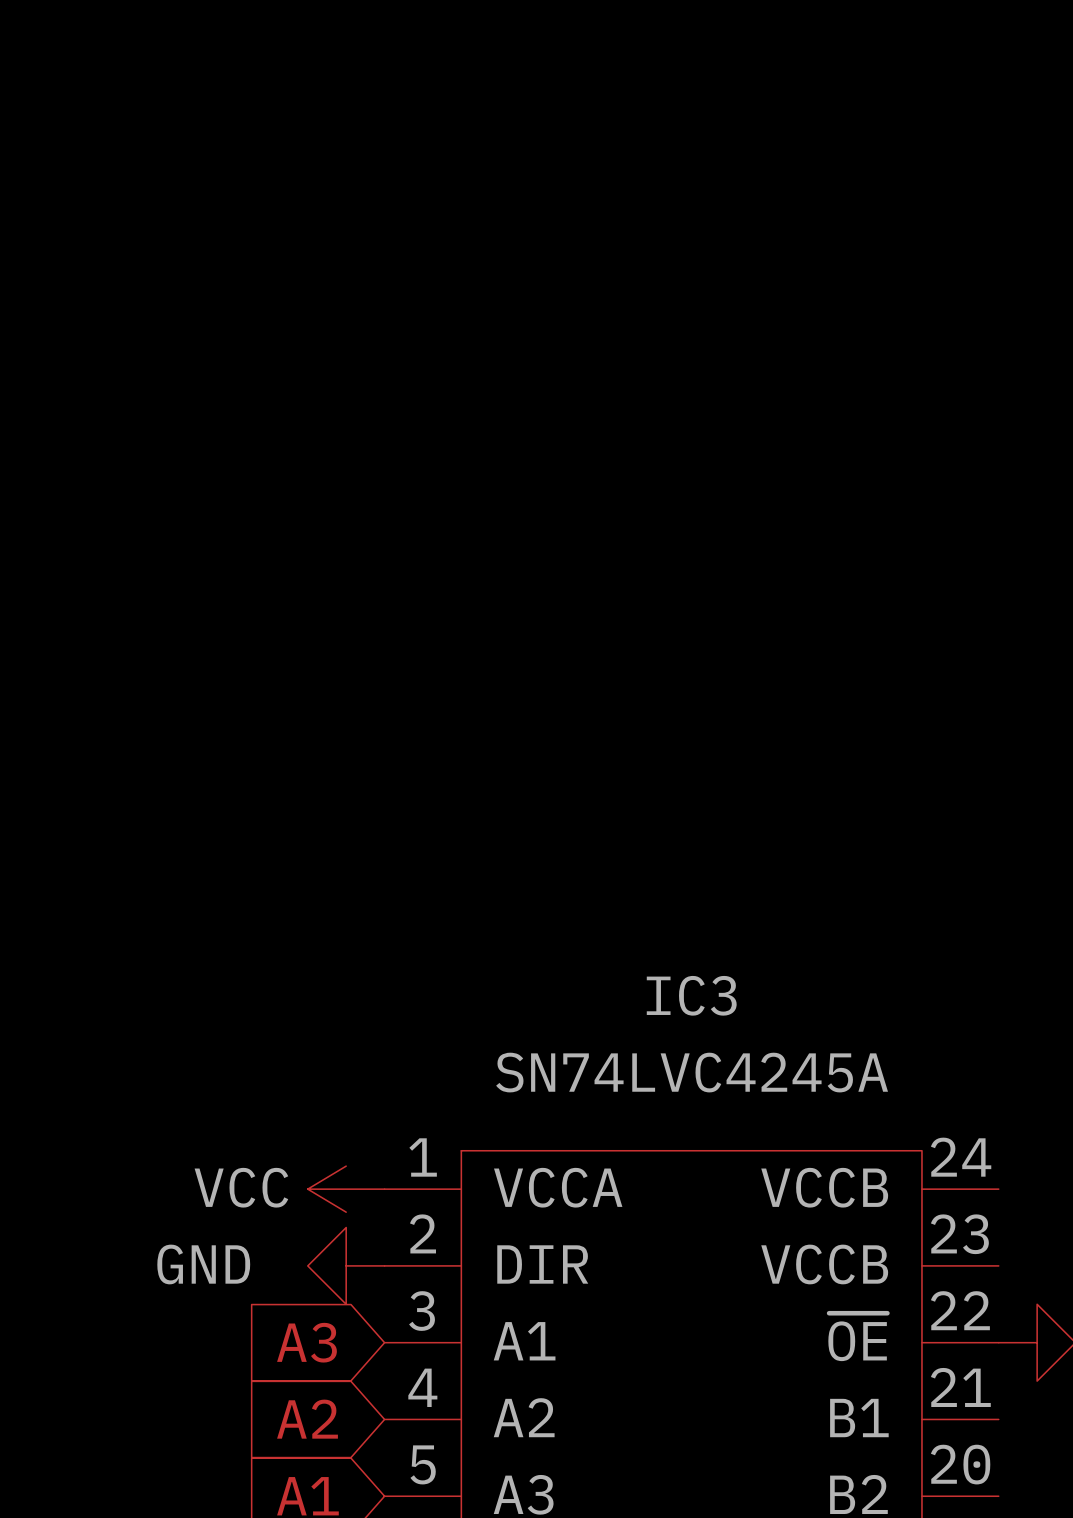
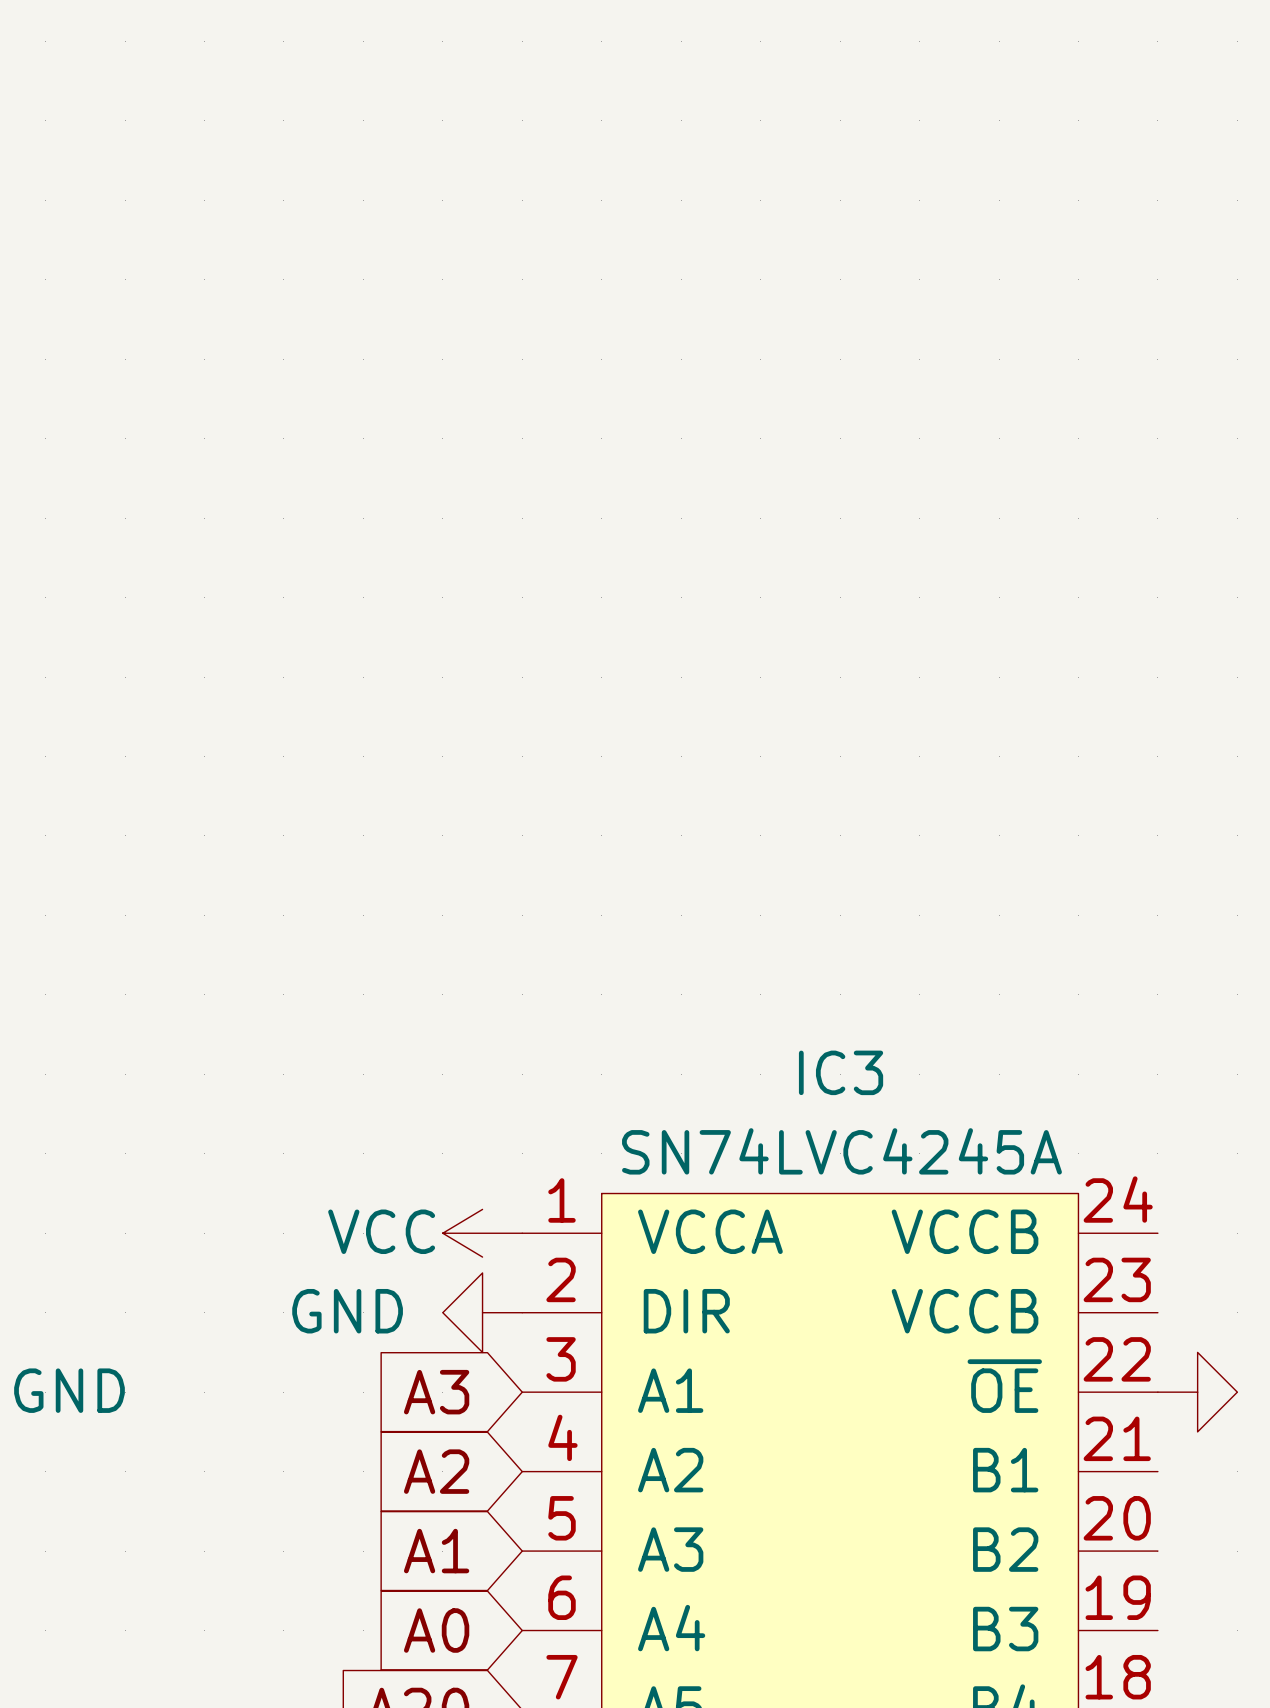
IC3 name position: IC3 (691, 995) -> IC3 (841, 1072)
IC3 value position: SN74LVC4245A (692, 1072) -> SN74LVC4245A (841, 1151)

